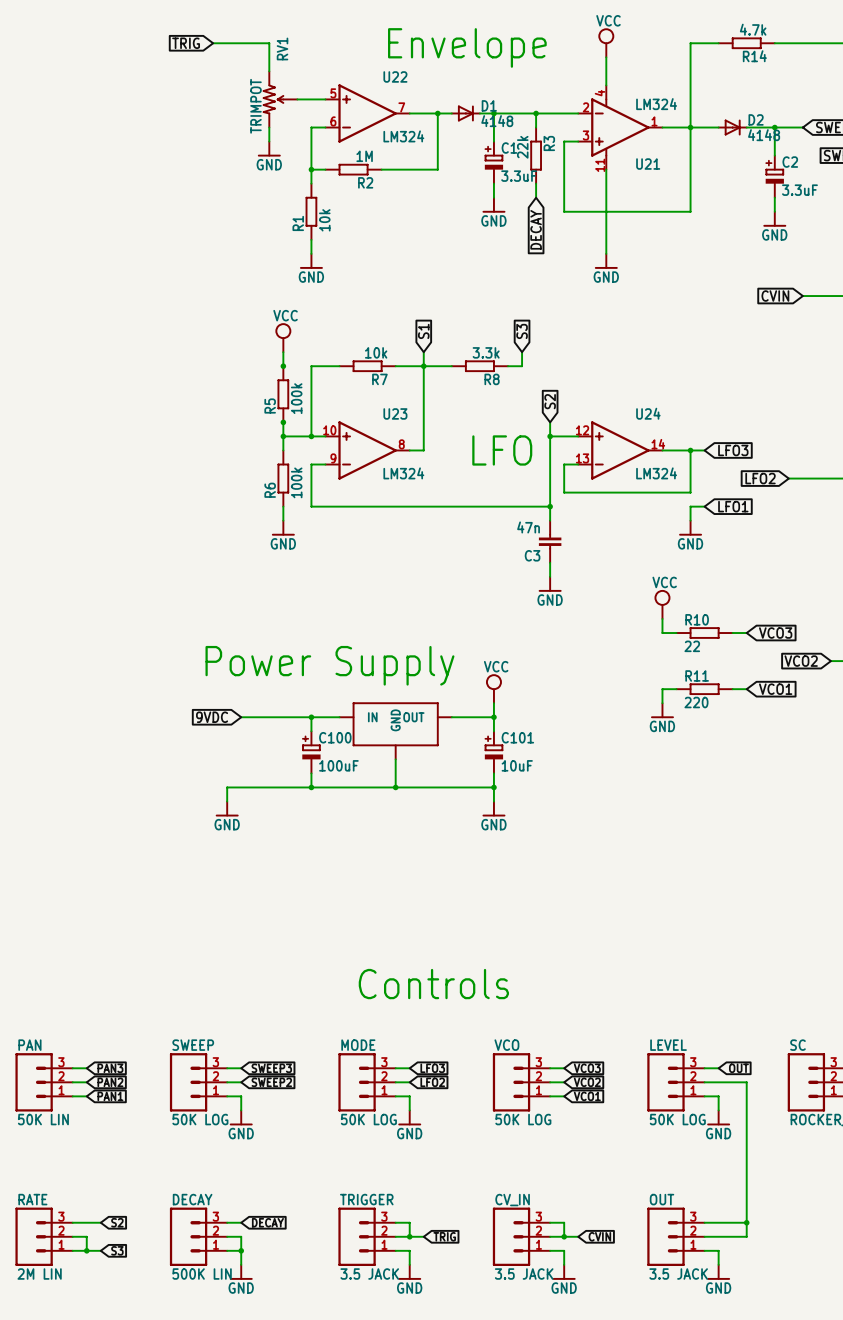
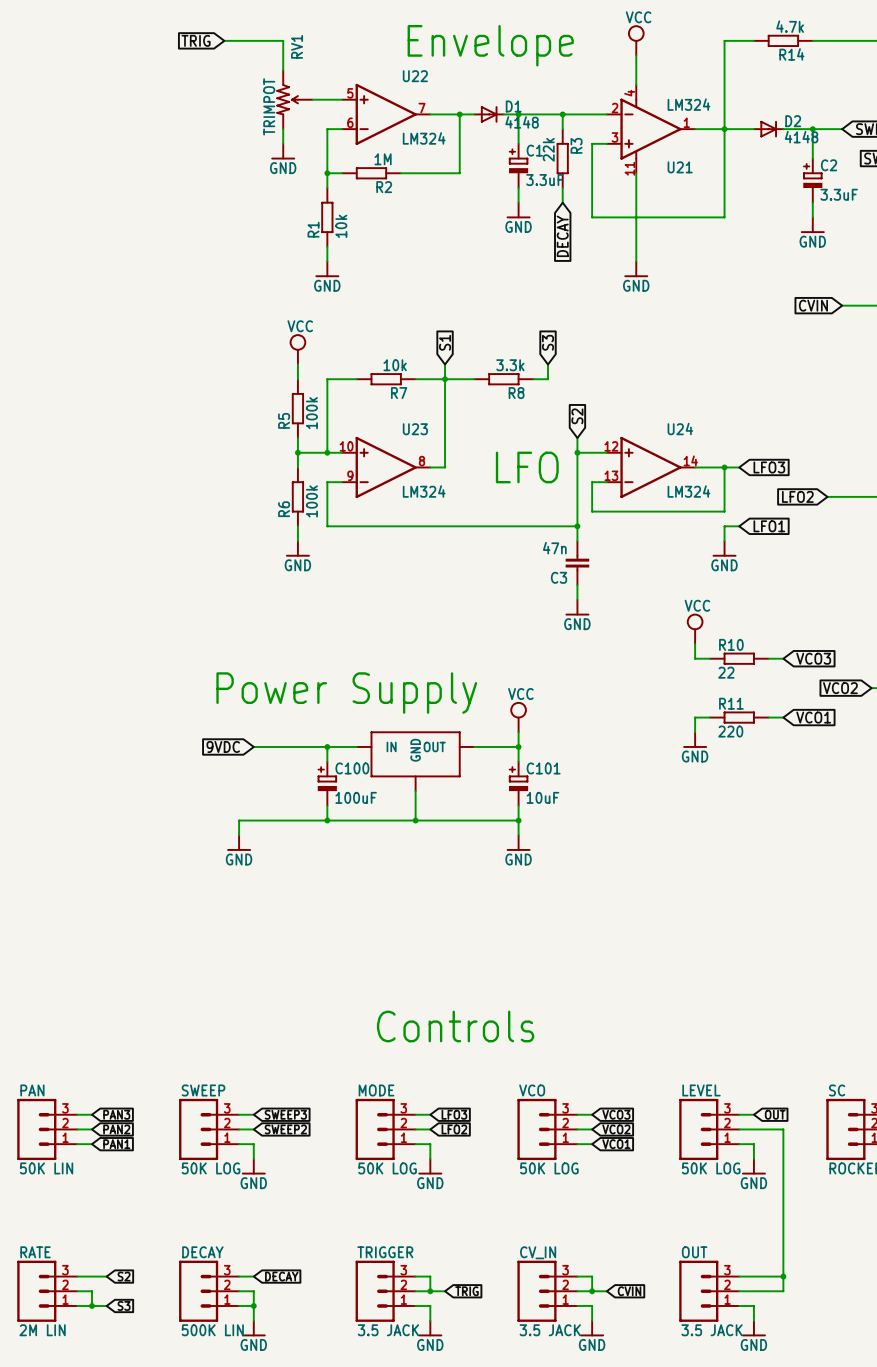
junction: (283, 366) -> none
junction: (283, 422) -> none

